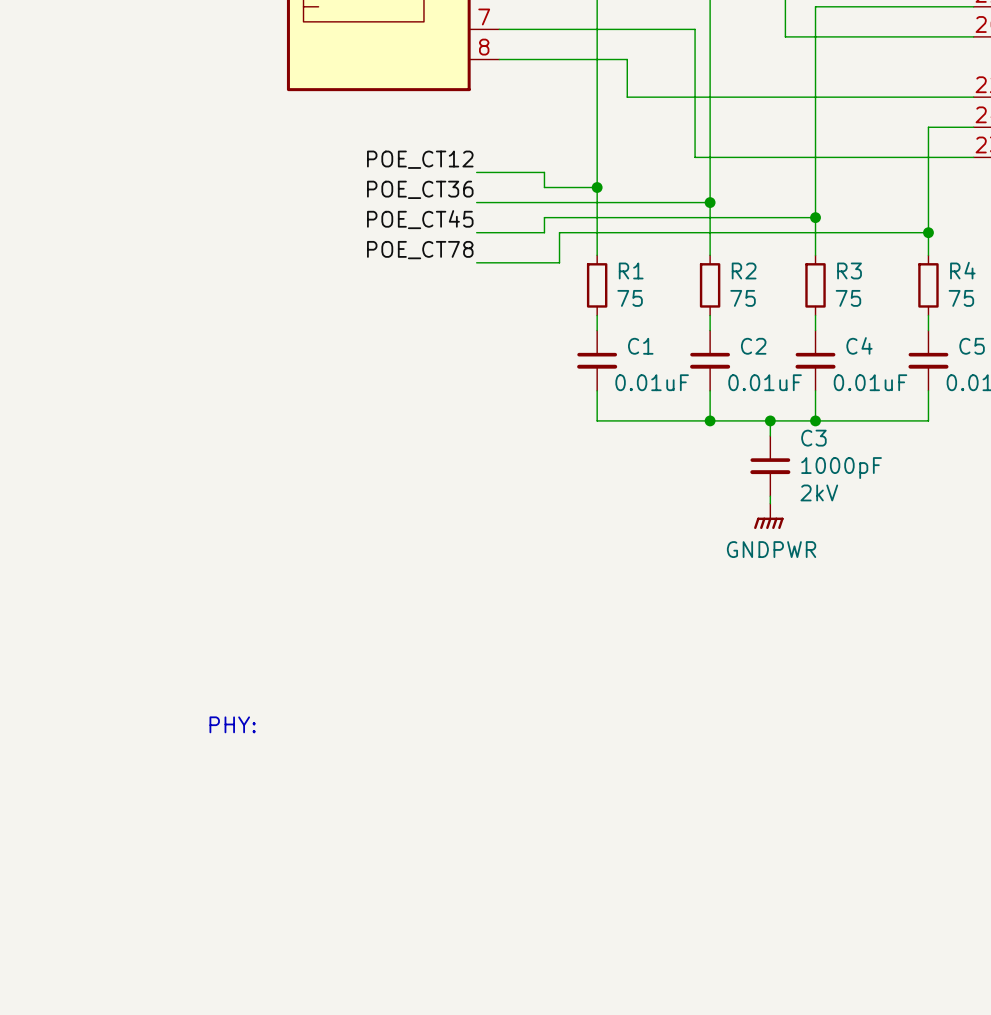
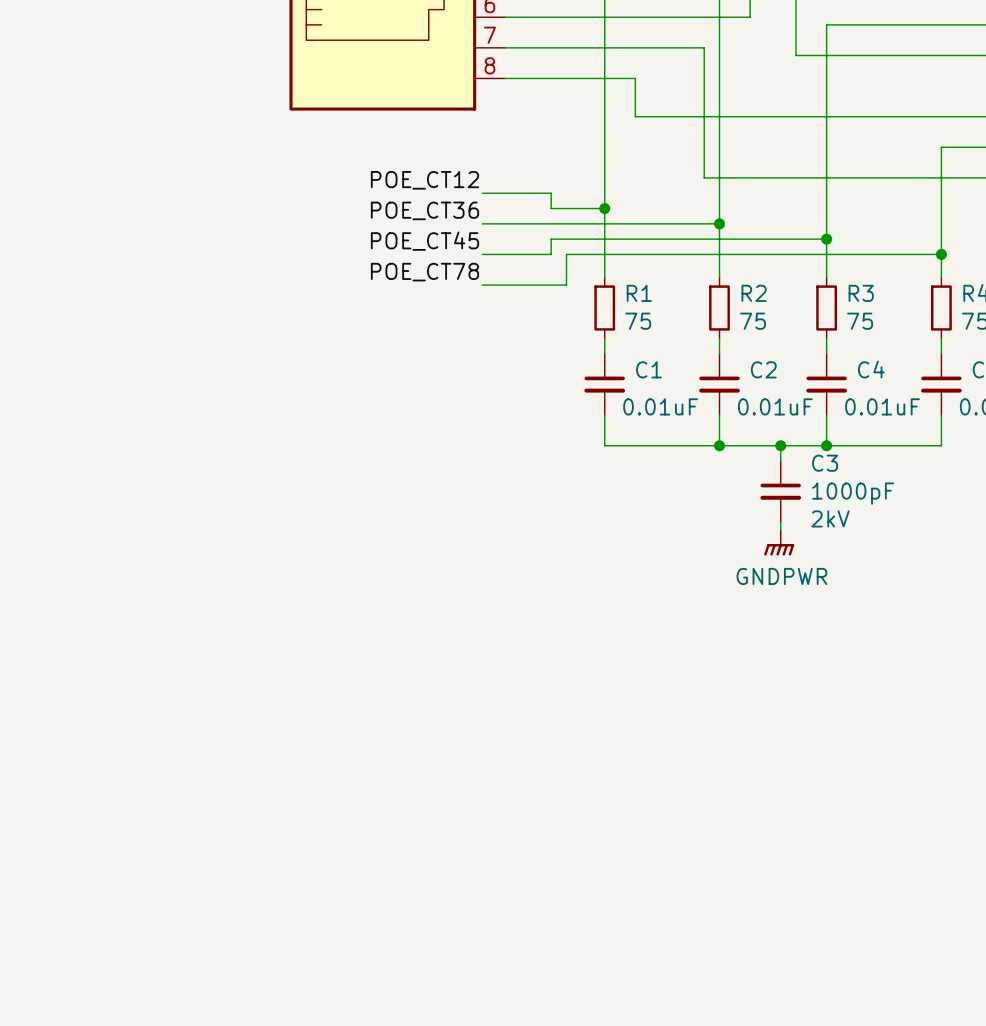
text: PHY: (232, 724) -> none

